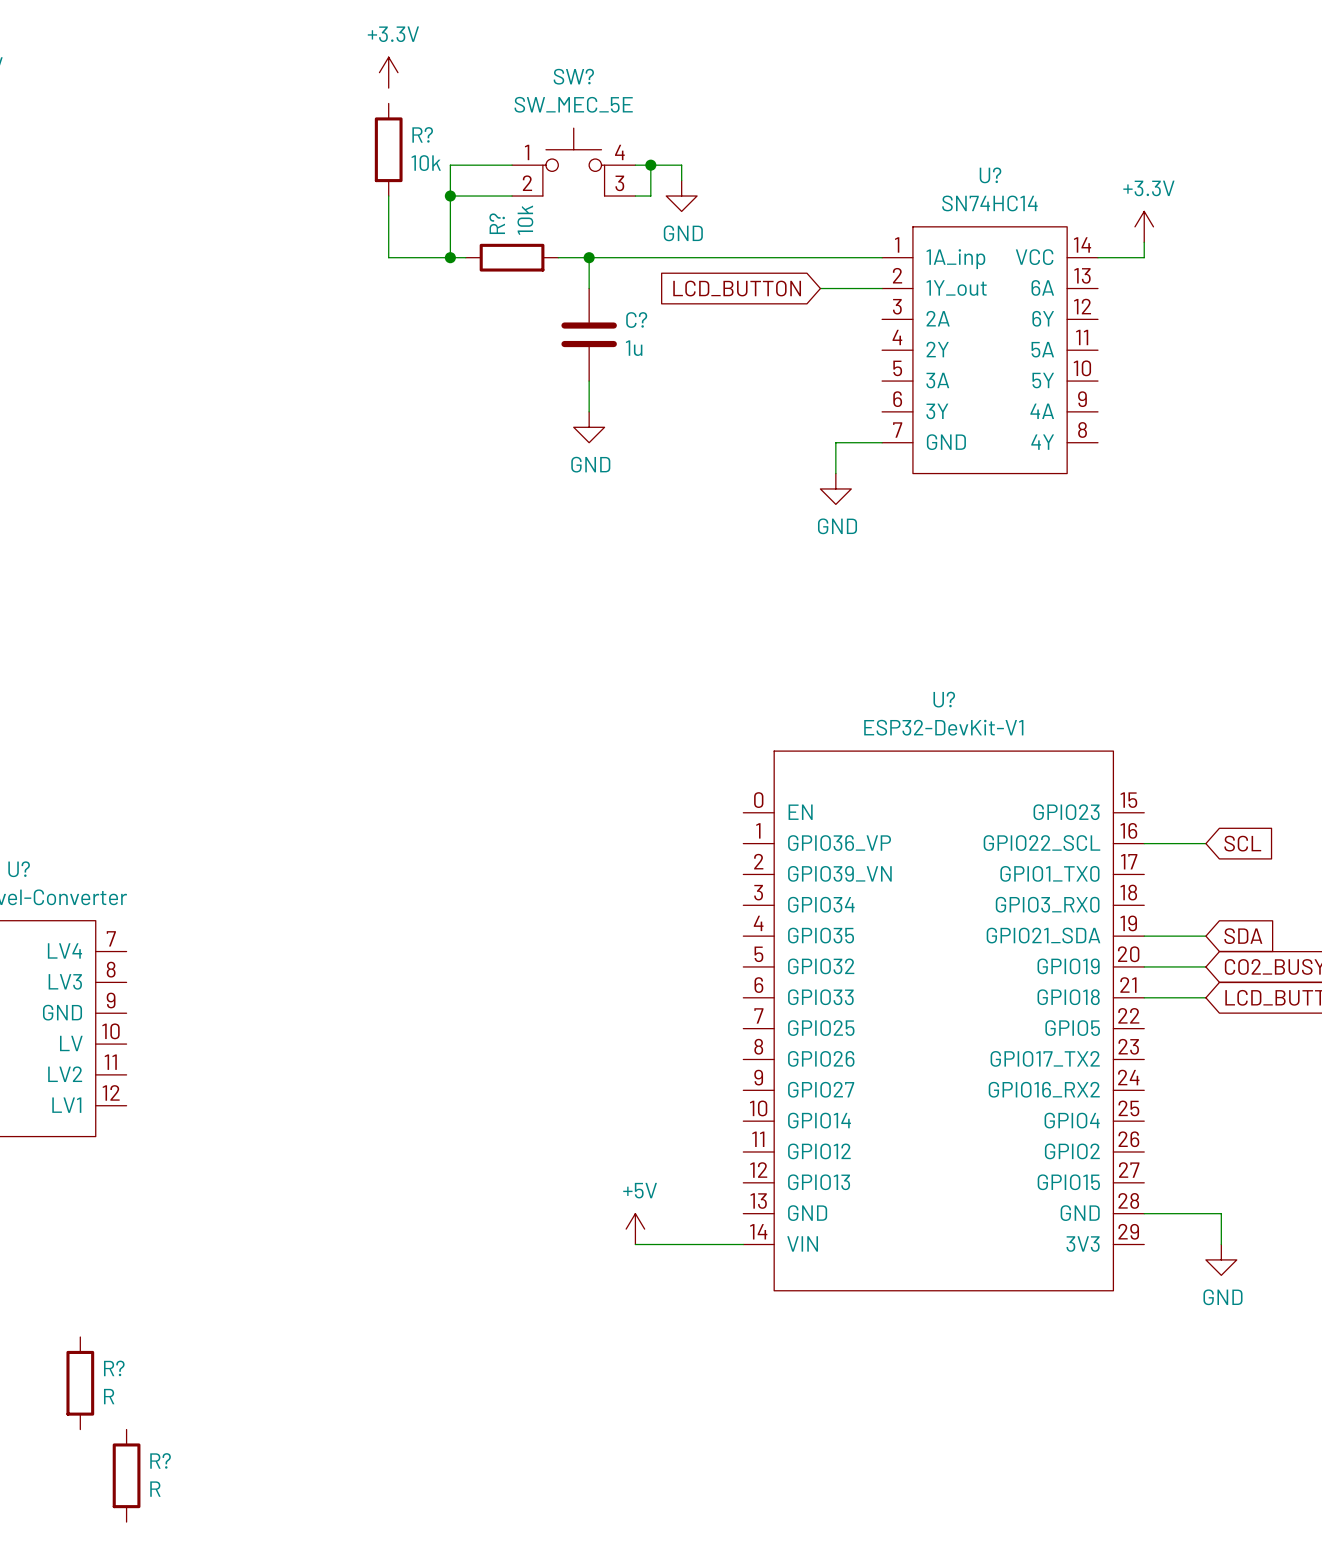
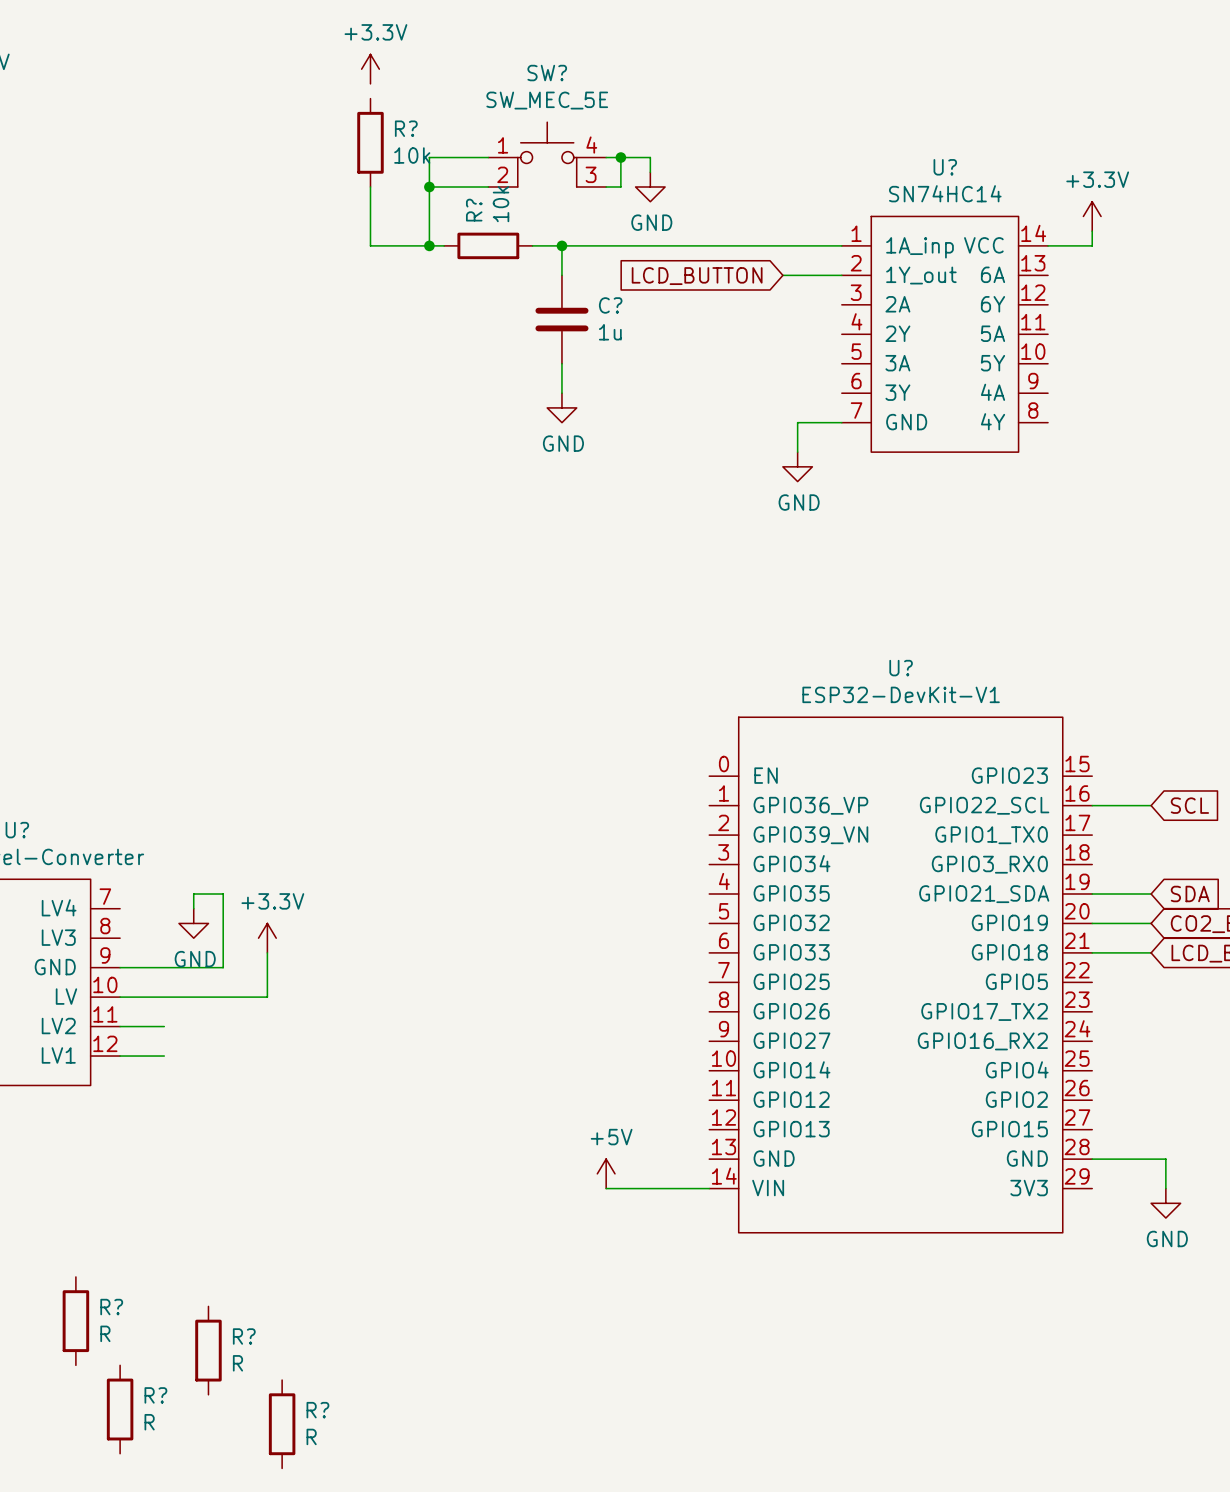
wire: none -> (193, 908) (193, 893) (223, 893) (223, 967) (120, 967)
power symbol: none -> GND (193, 923)
power symbol: none -> +3.3V (267, 938)
wire: none -> (267, 952) (267, 997) (120, 997)
wire: none -> (120, 1026) (164, 1026)
wire: none -> (120, 1056) (164, 1056)
R?: none -> R (208, 1350)
R?: none -> R (282, 1424)

